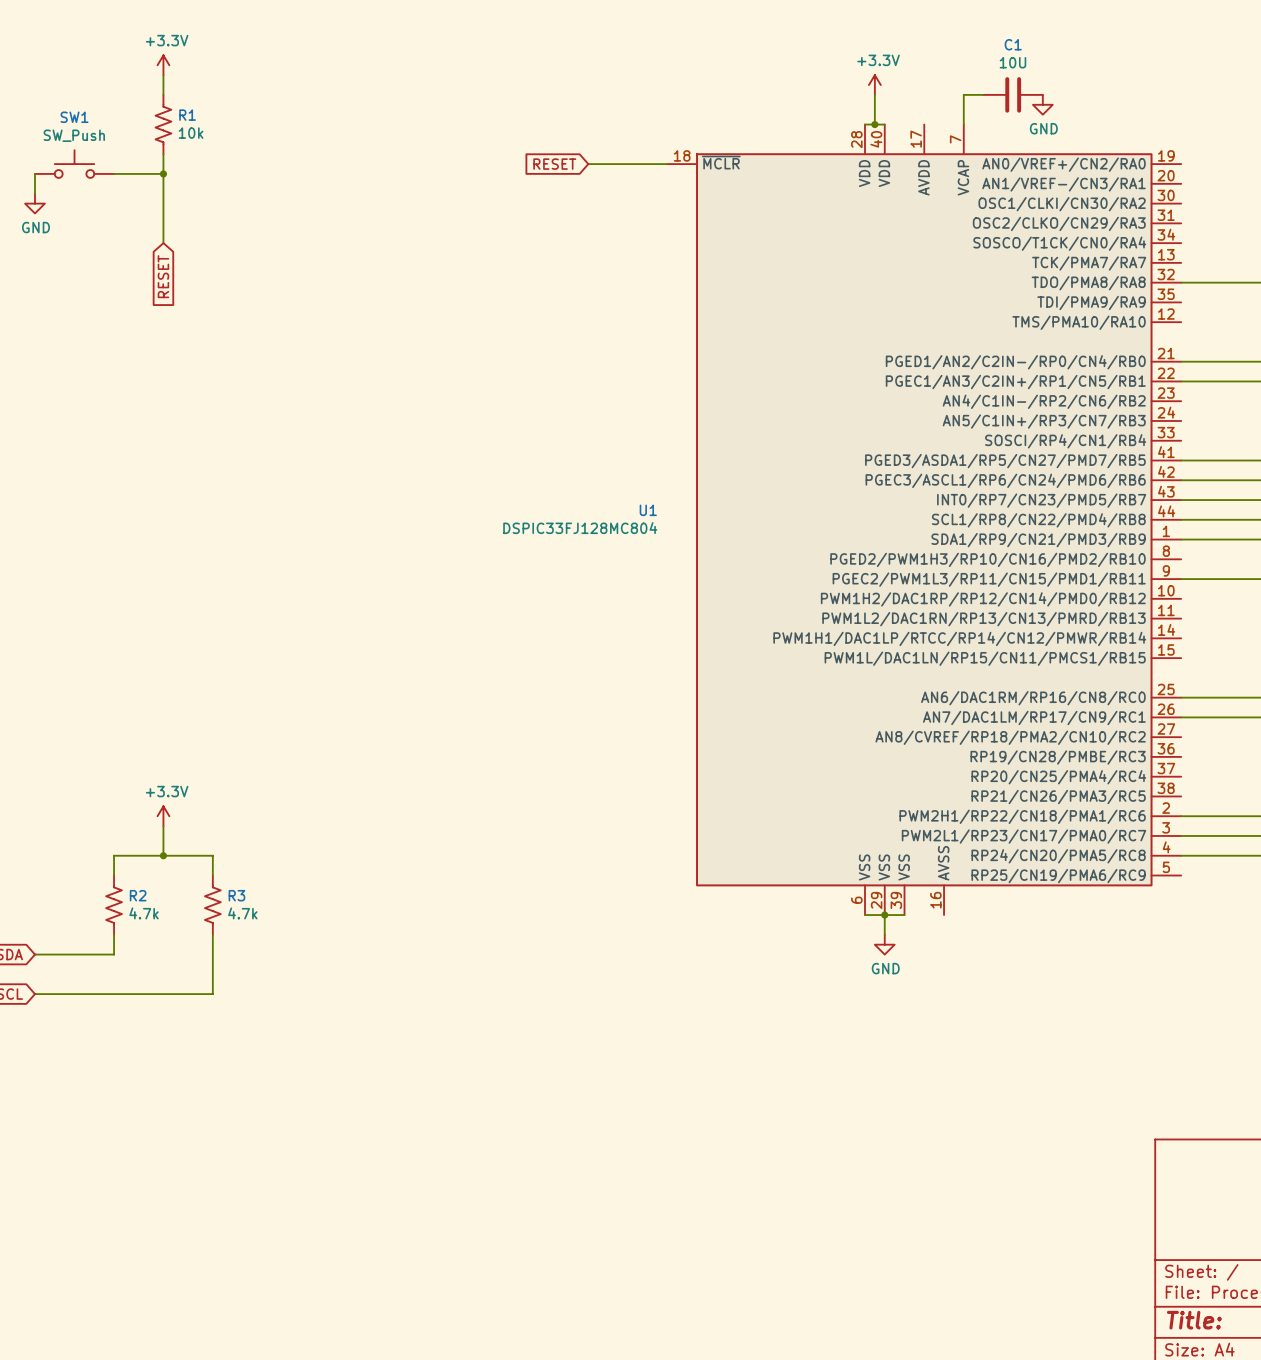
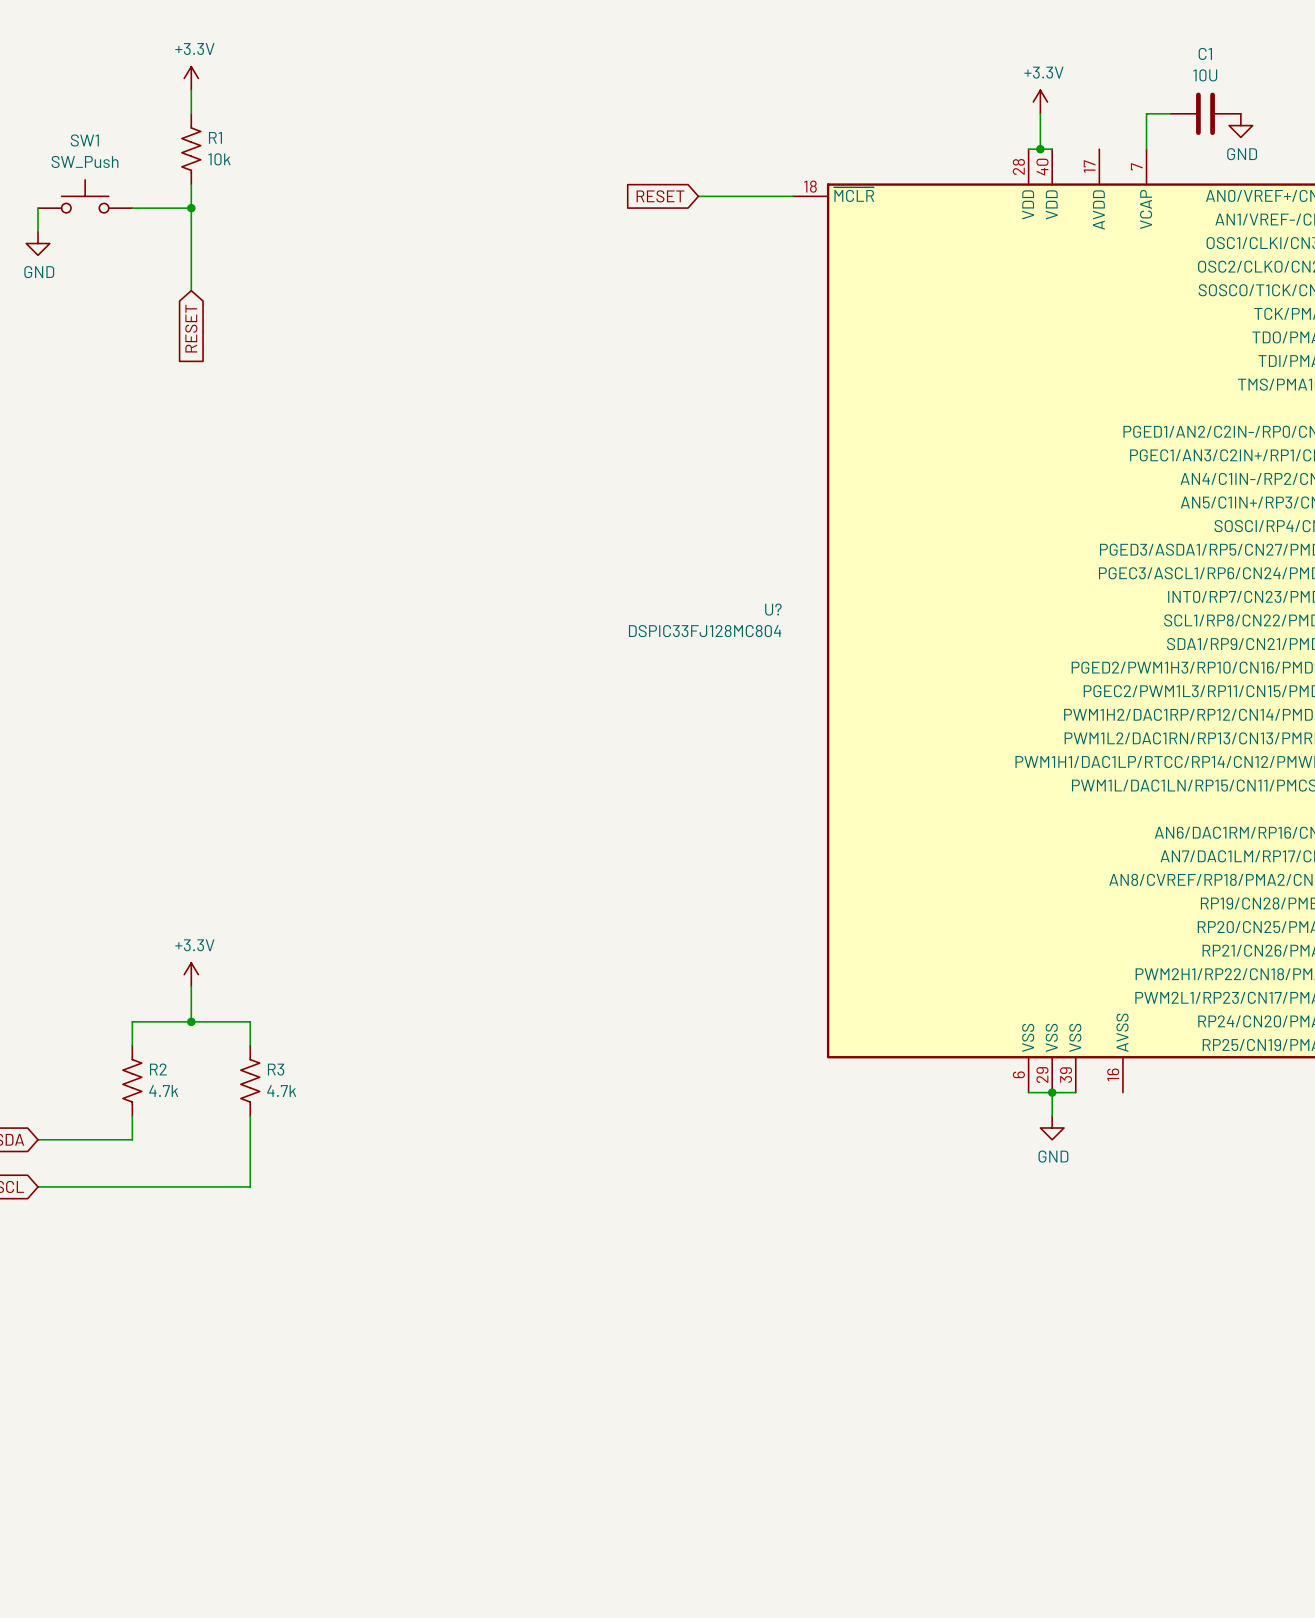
U1 name: U1 (648, 510) -> U? (773, 609)

